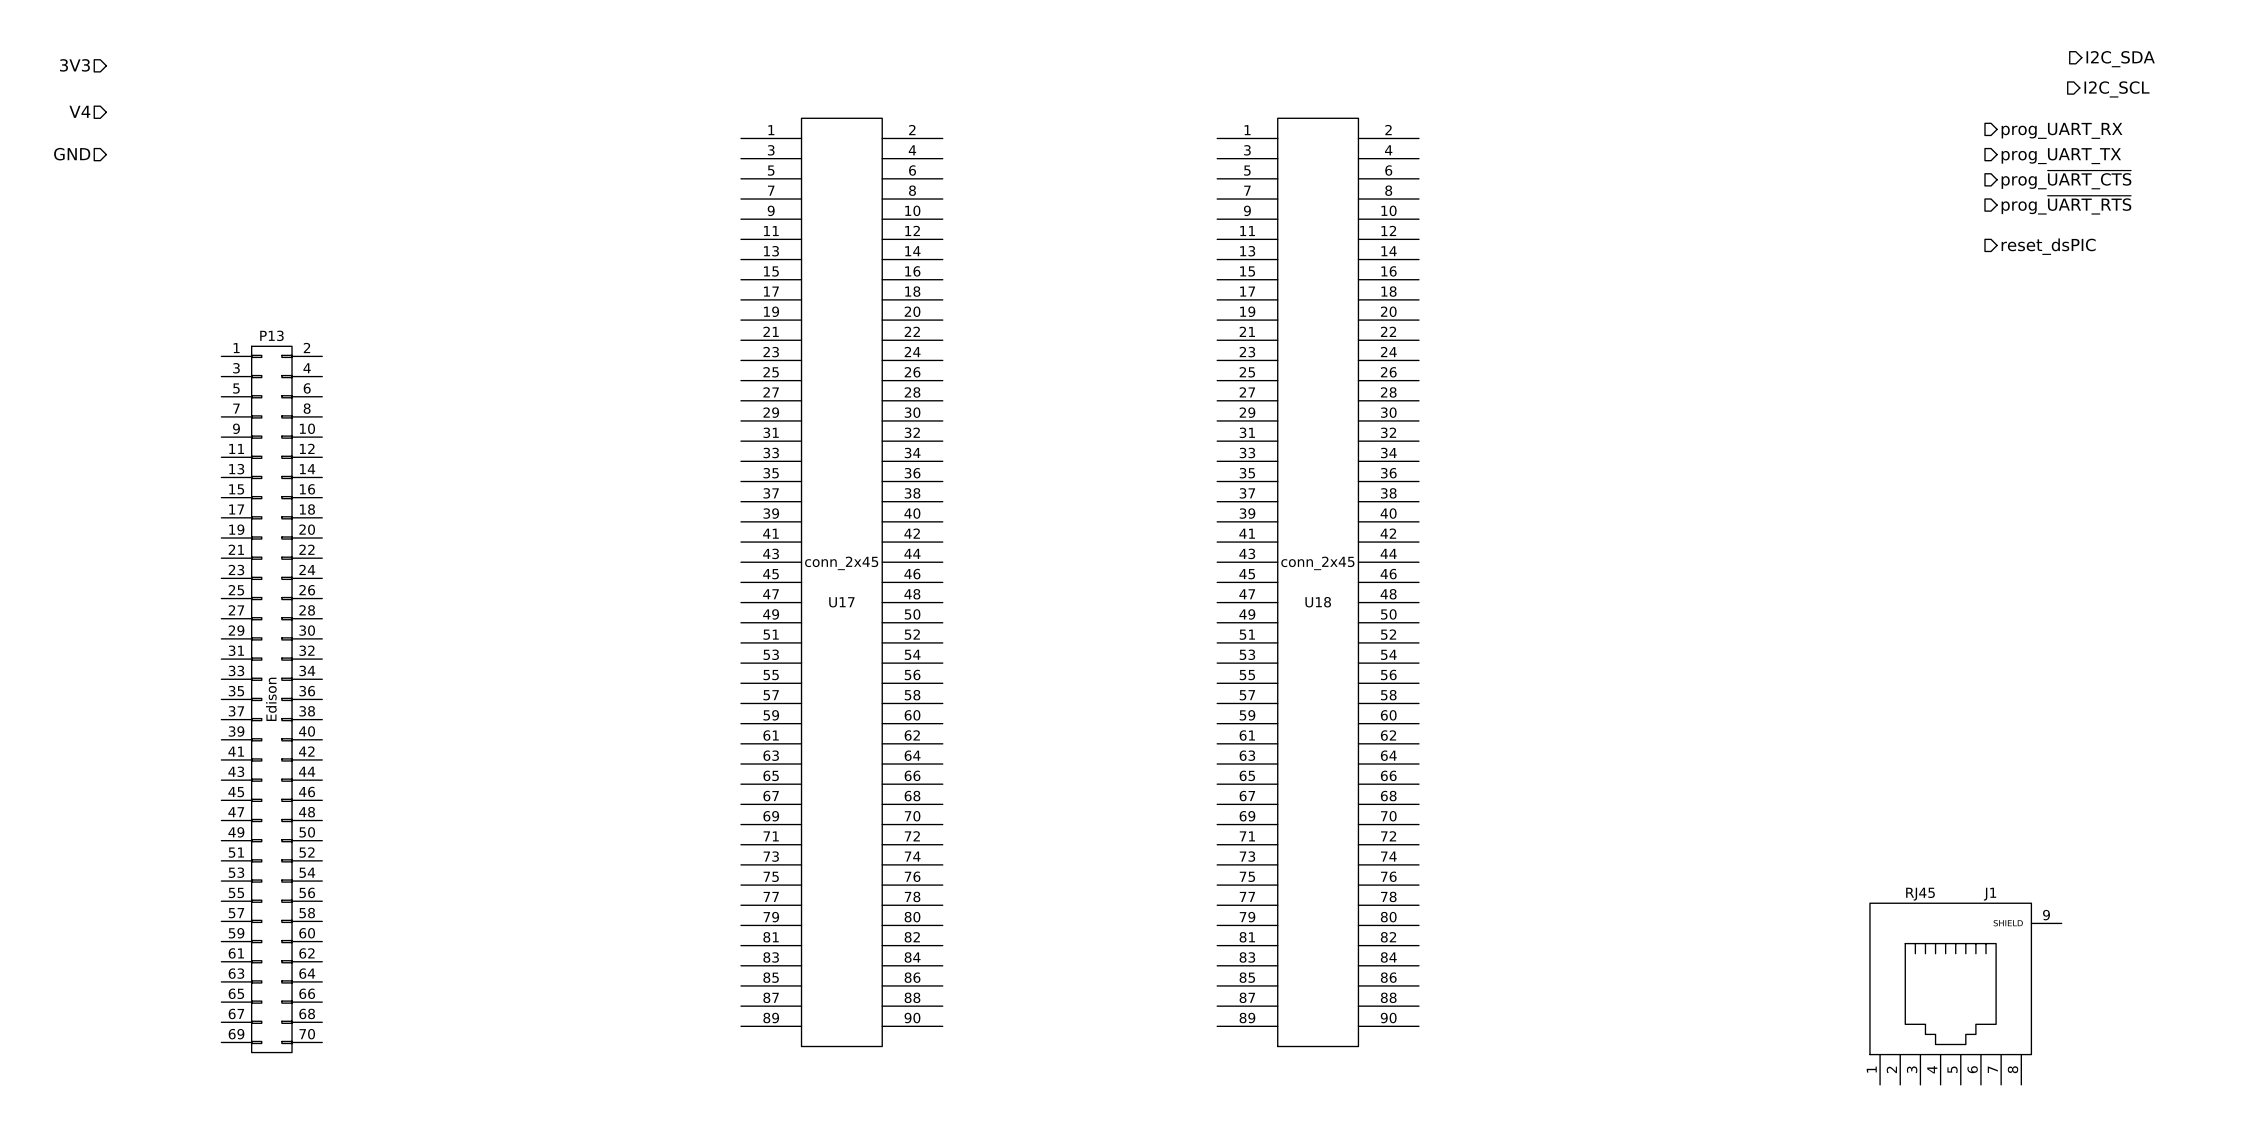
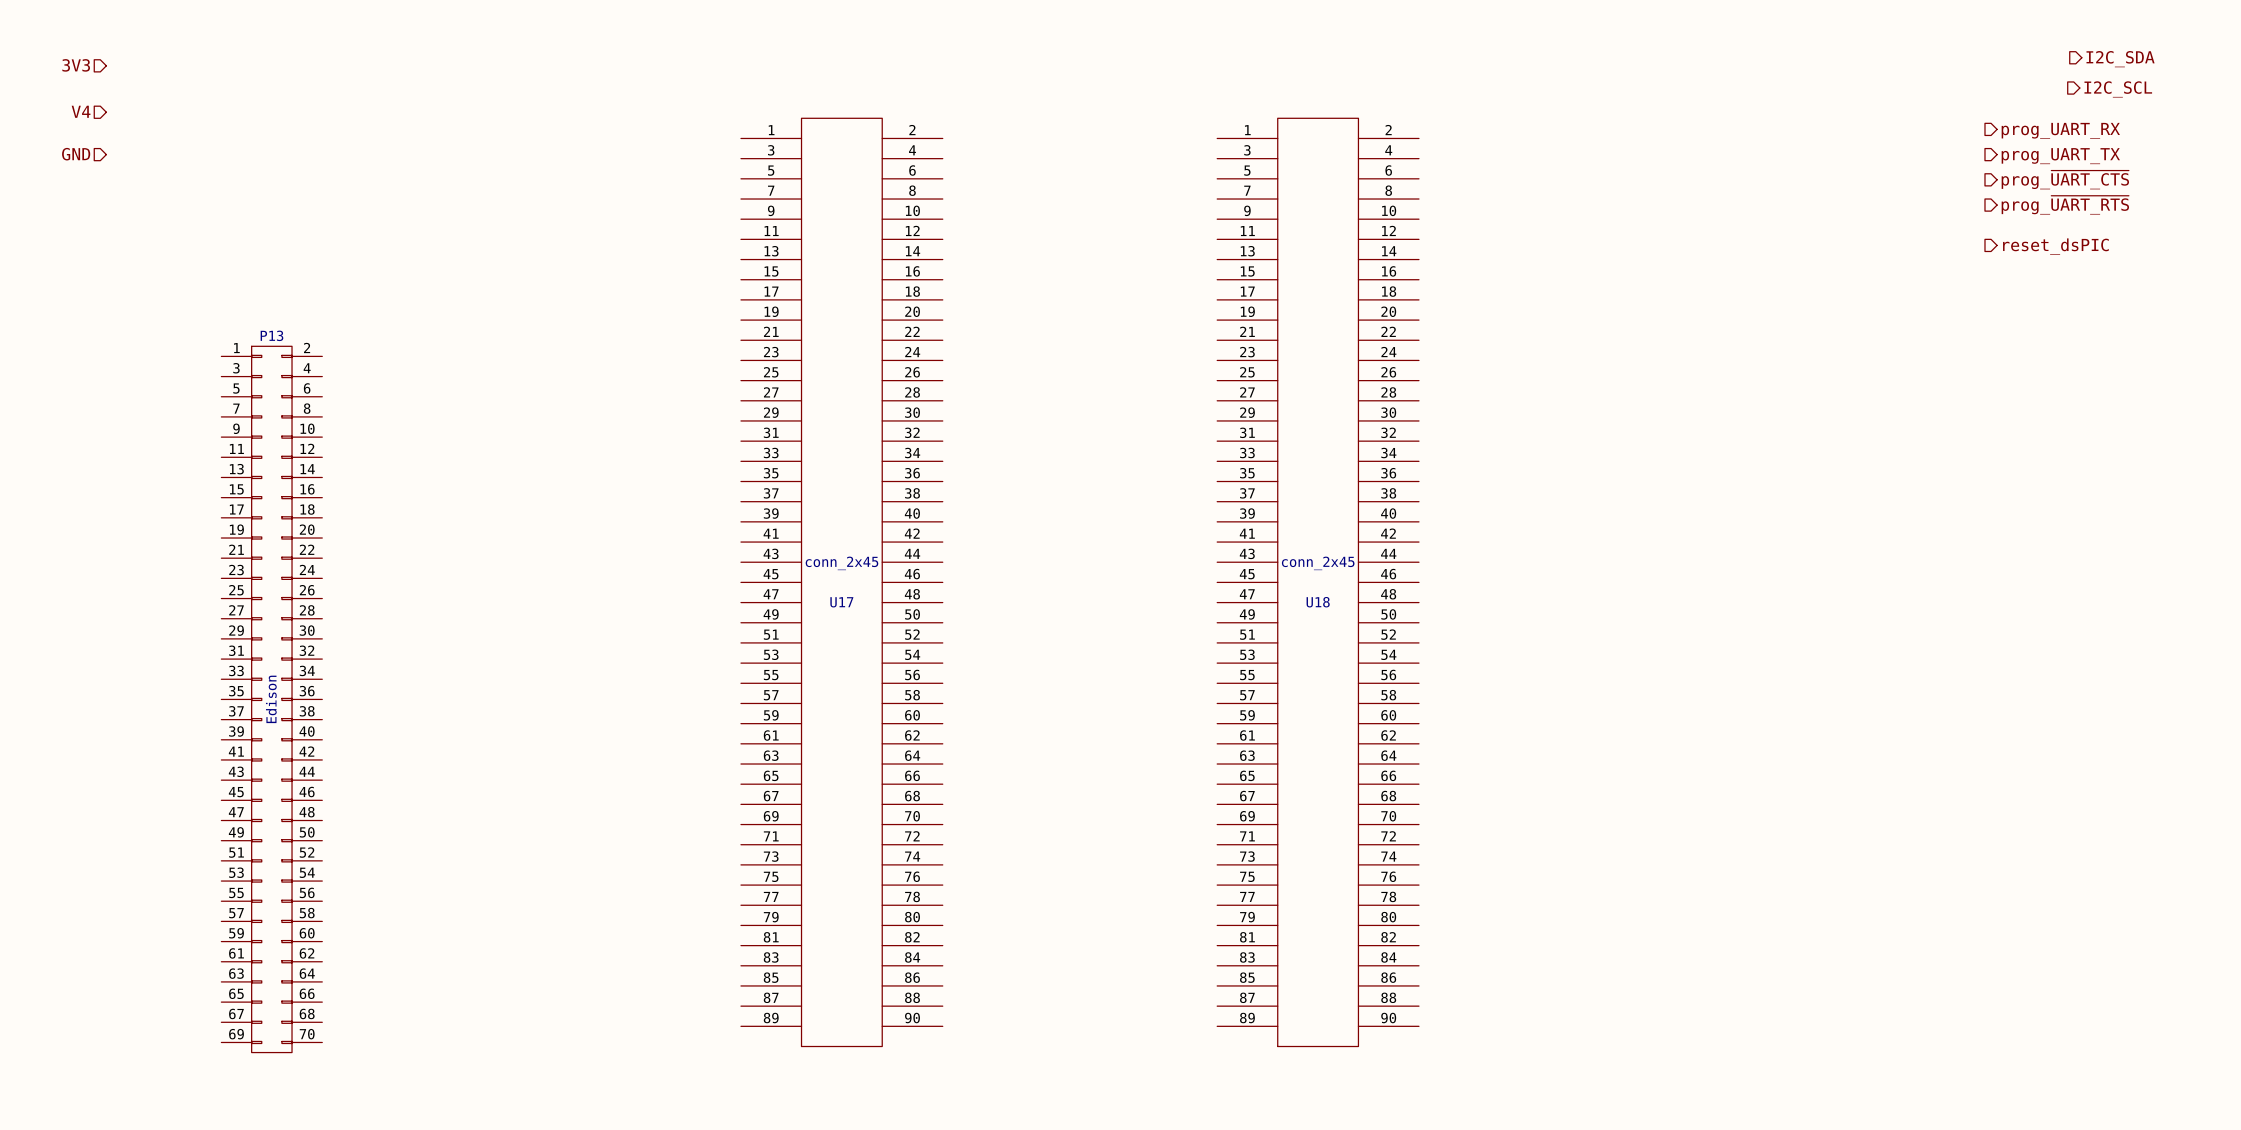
J1: RJ45 (1965, 994) -> none

